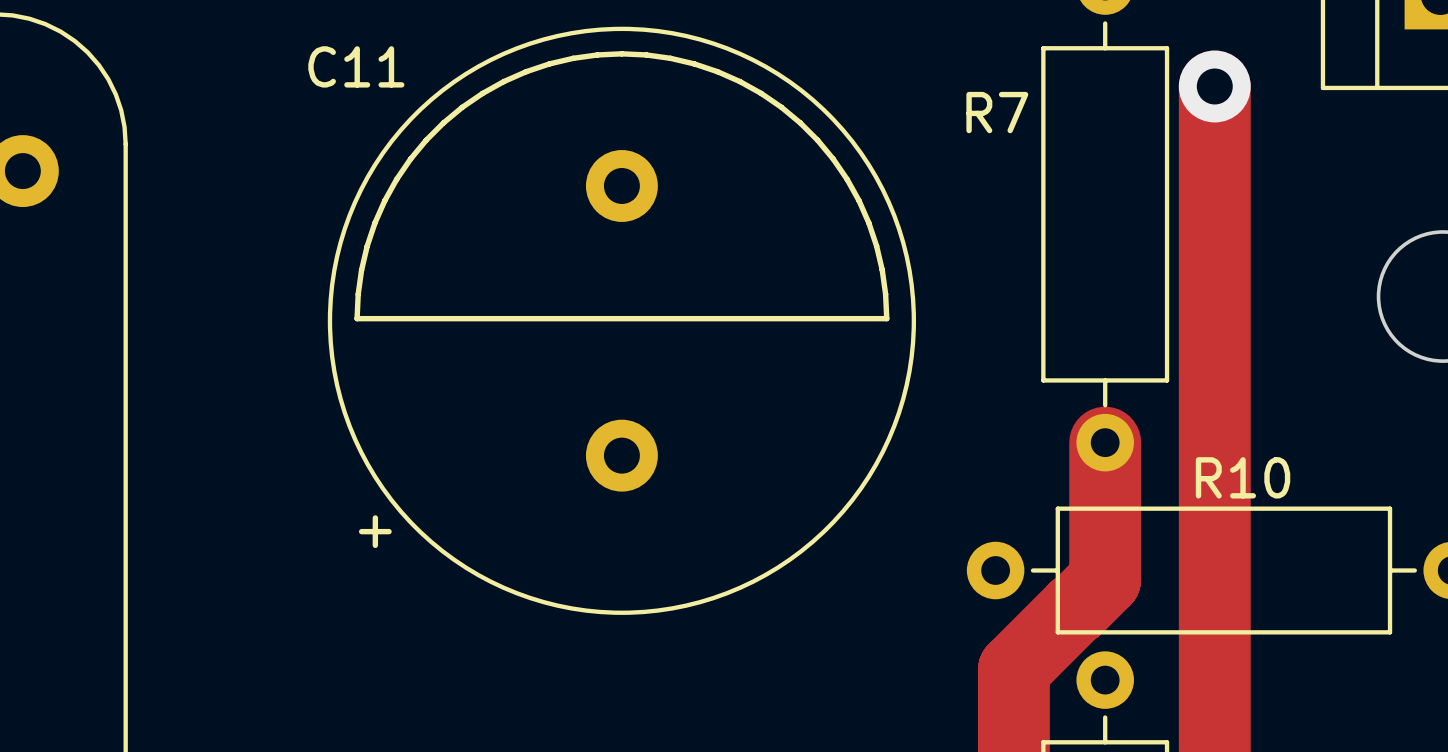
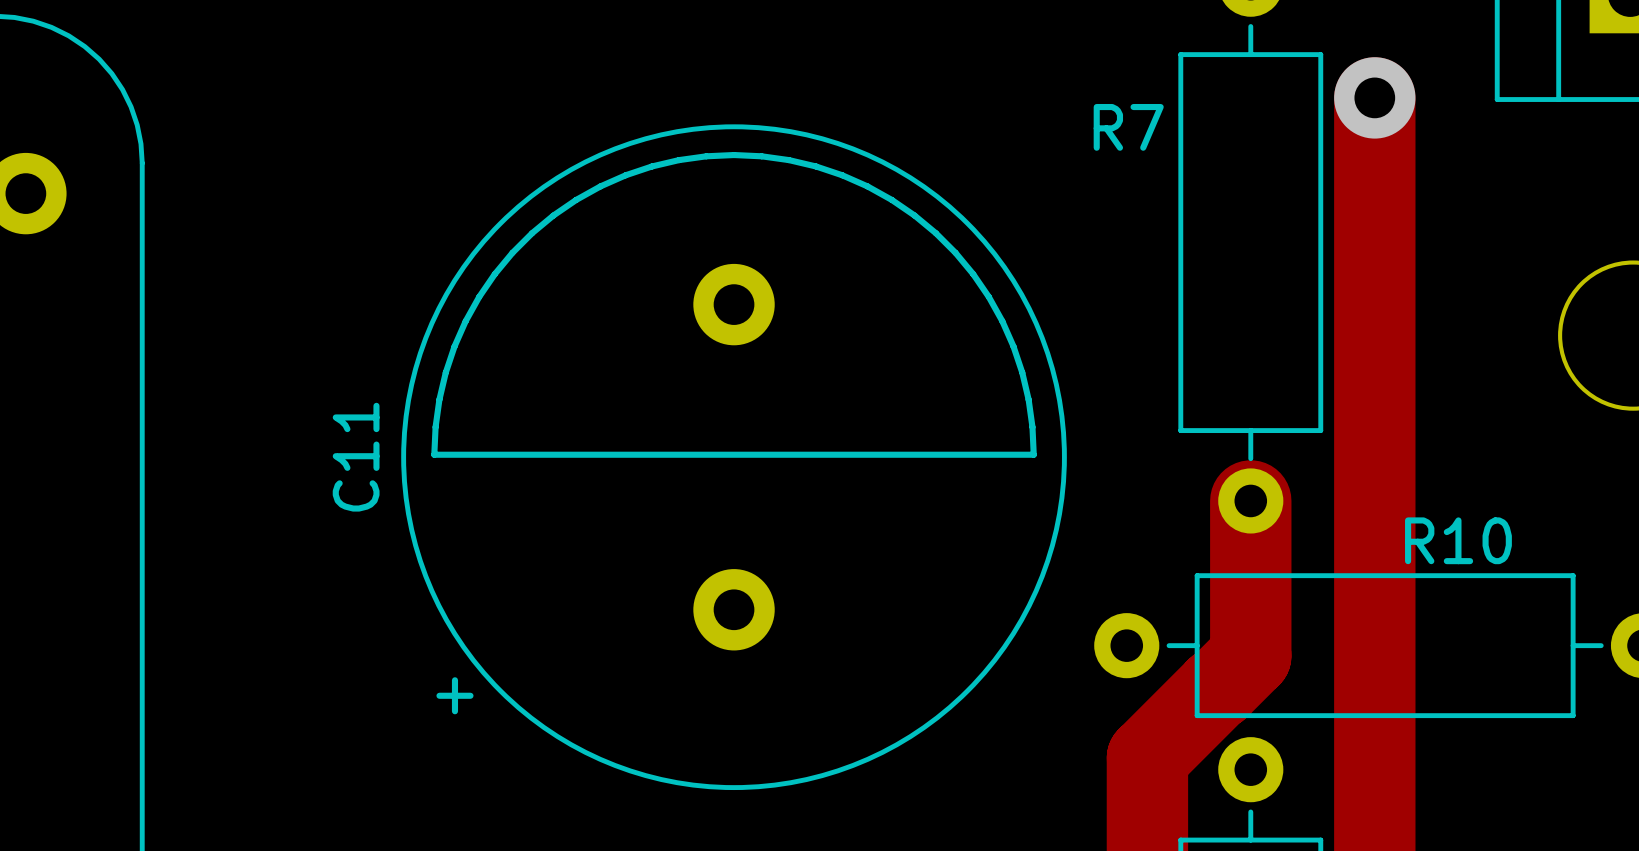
line: (621, 53) (670, 58) (717, 71) (761, 93) (800, 122) (833, 159) (858, 200) (868, 222) (882, 269) (886, 318) (357, 318) (361, 269) (374, 222) (396, 179) (426, 140) (462, 107) (503, 81) (526, 71) (573, 58) (621, 53) -> (734, 155) (789, 160) (842, 175) (891, 199) (935, 233) (973, 274) (1002, 321) (1013, 346) (1028, 399) (1033, 454) (434, 454) (439, 399) (454, 346) (479, 296) (512, 252) (553, 215) (600, 186) (625, 175) (678, 160) (734, 155)
C11 name rotation: 0° (356, 66) -> 90° counterclockwise (356, 457)
C11 name position: C11 (356, 66) -> C11 (356, 457)
C11 position: (621, 320) -> (734, 457)
R10 name position: R10 (1243, 477) -> R10 (1458, 540)
text position: + (375, 531) -> + (454, 695)

